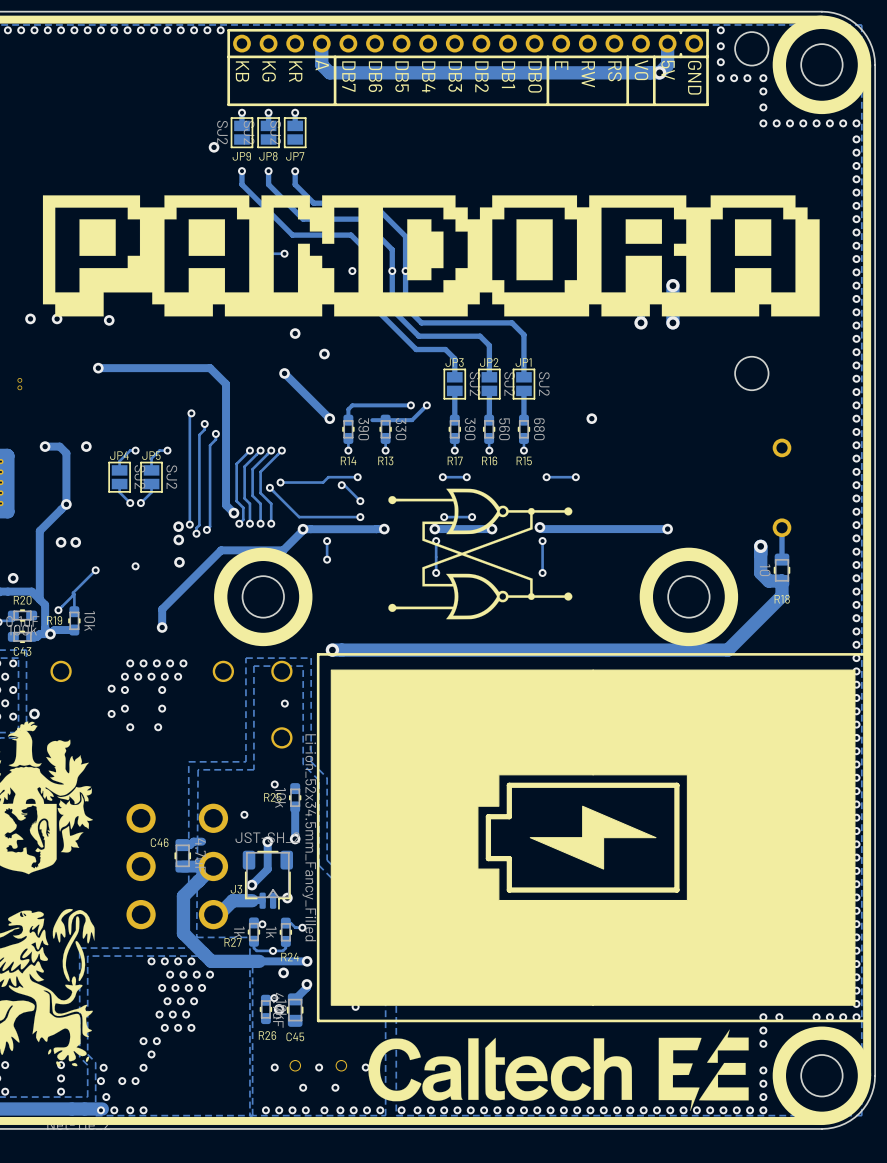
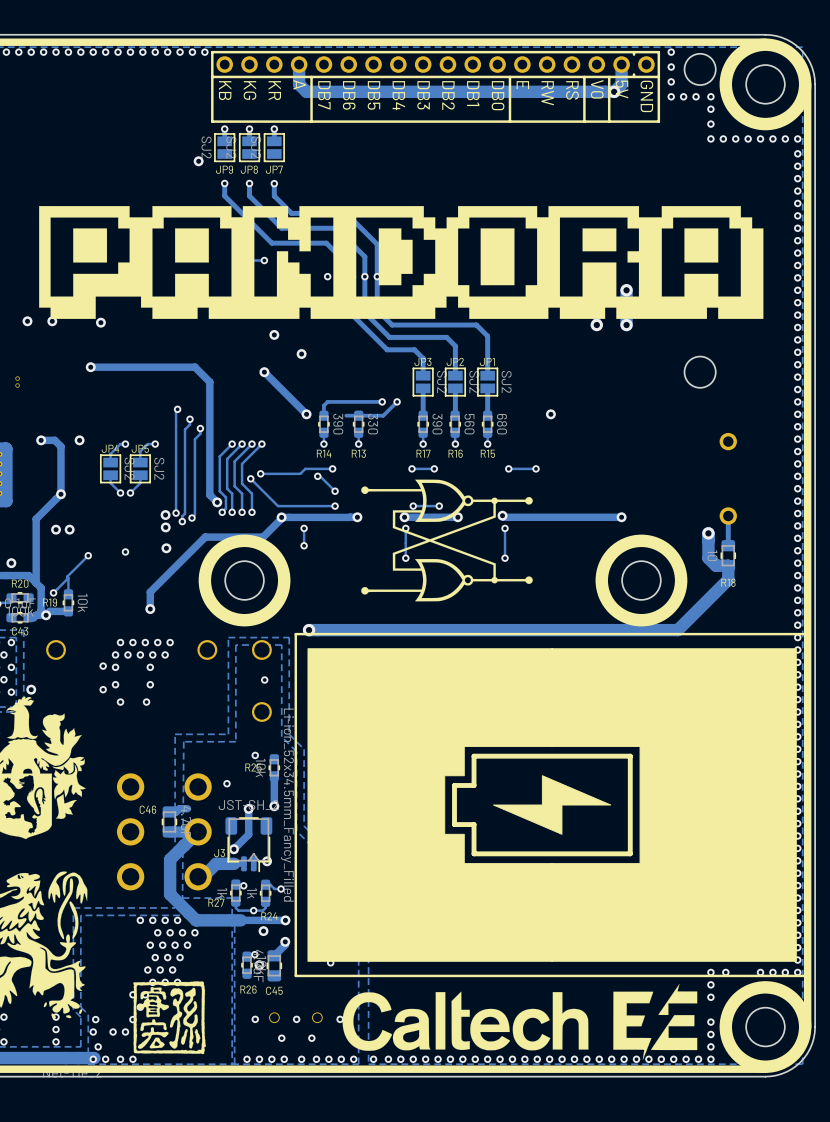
drawing: none -> [133, 981, 206, 1055]

